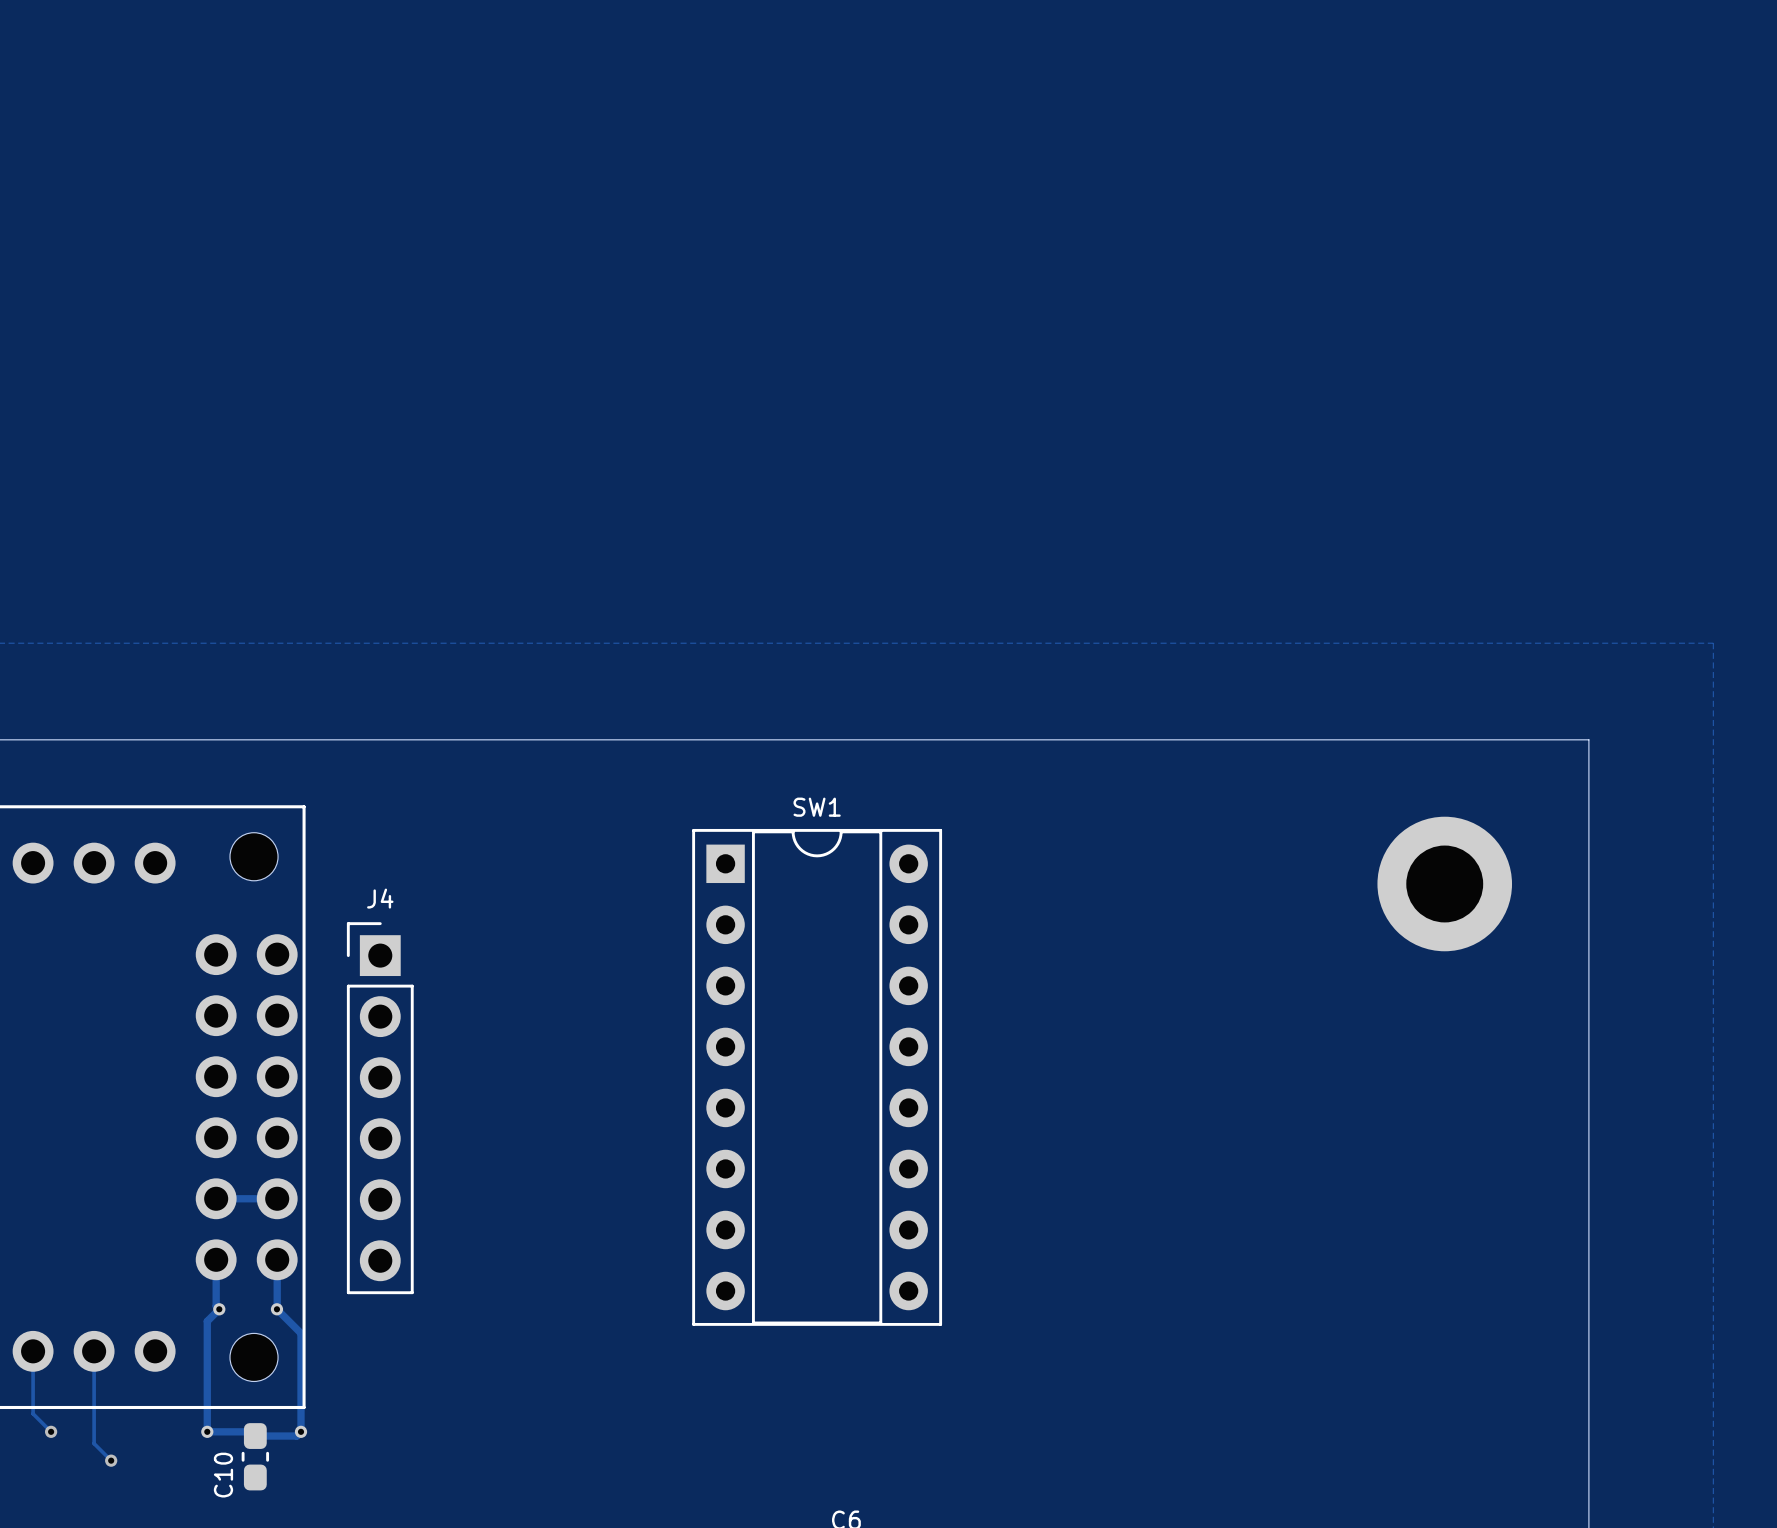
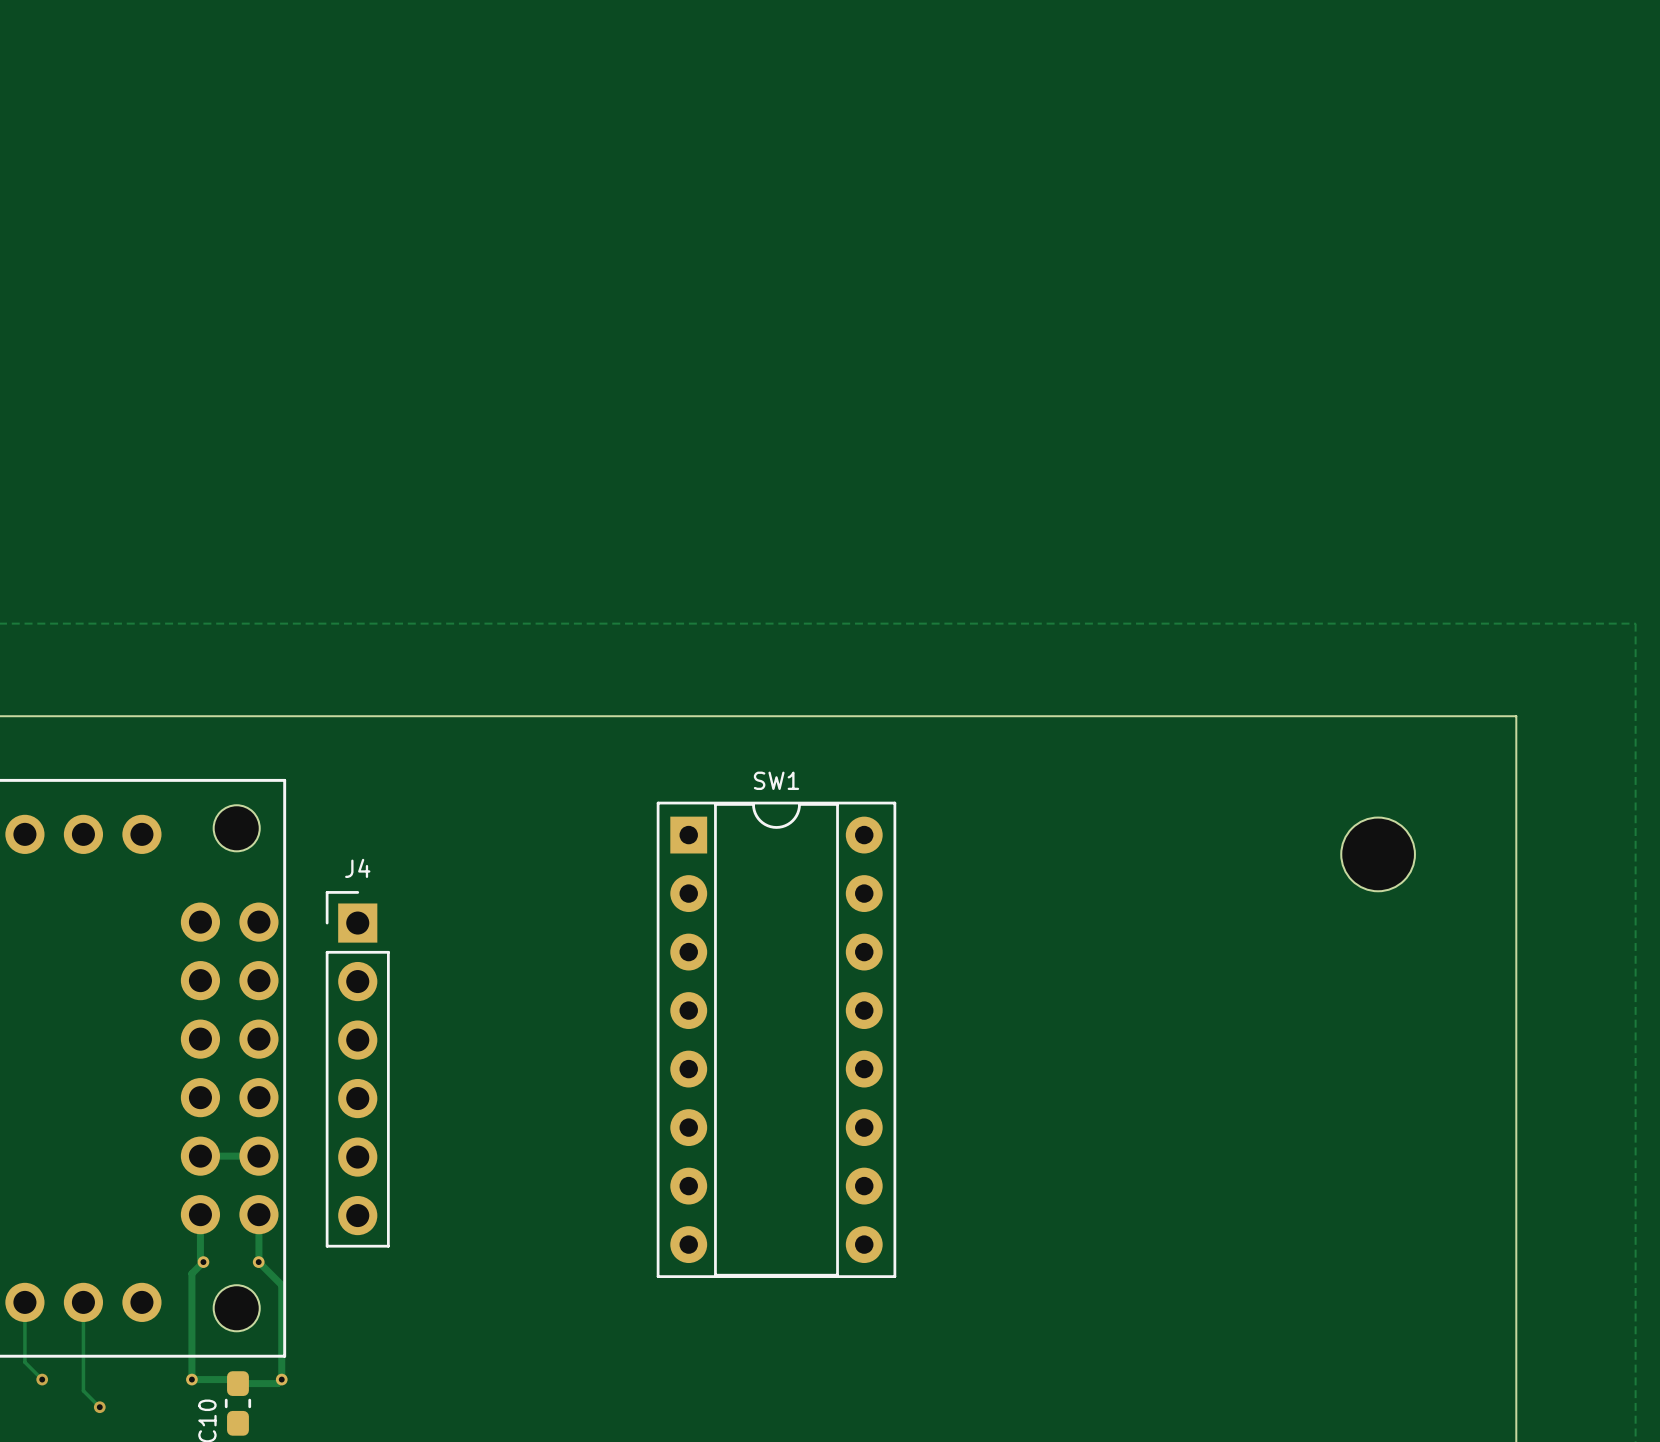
part footprint: [1377, 816, 1513, 952] -> [1341, 817, 1415, 892]

